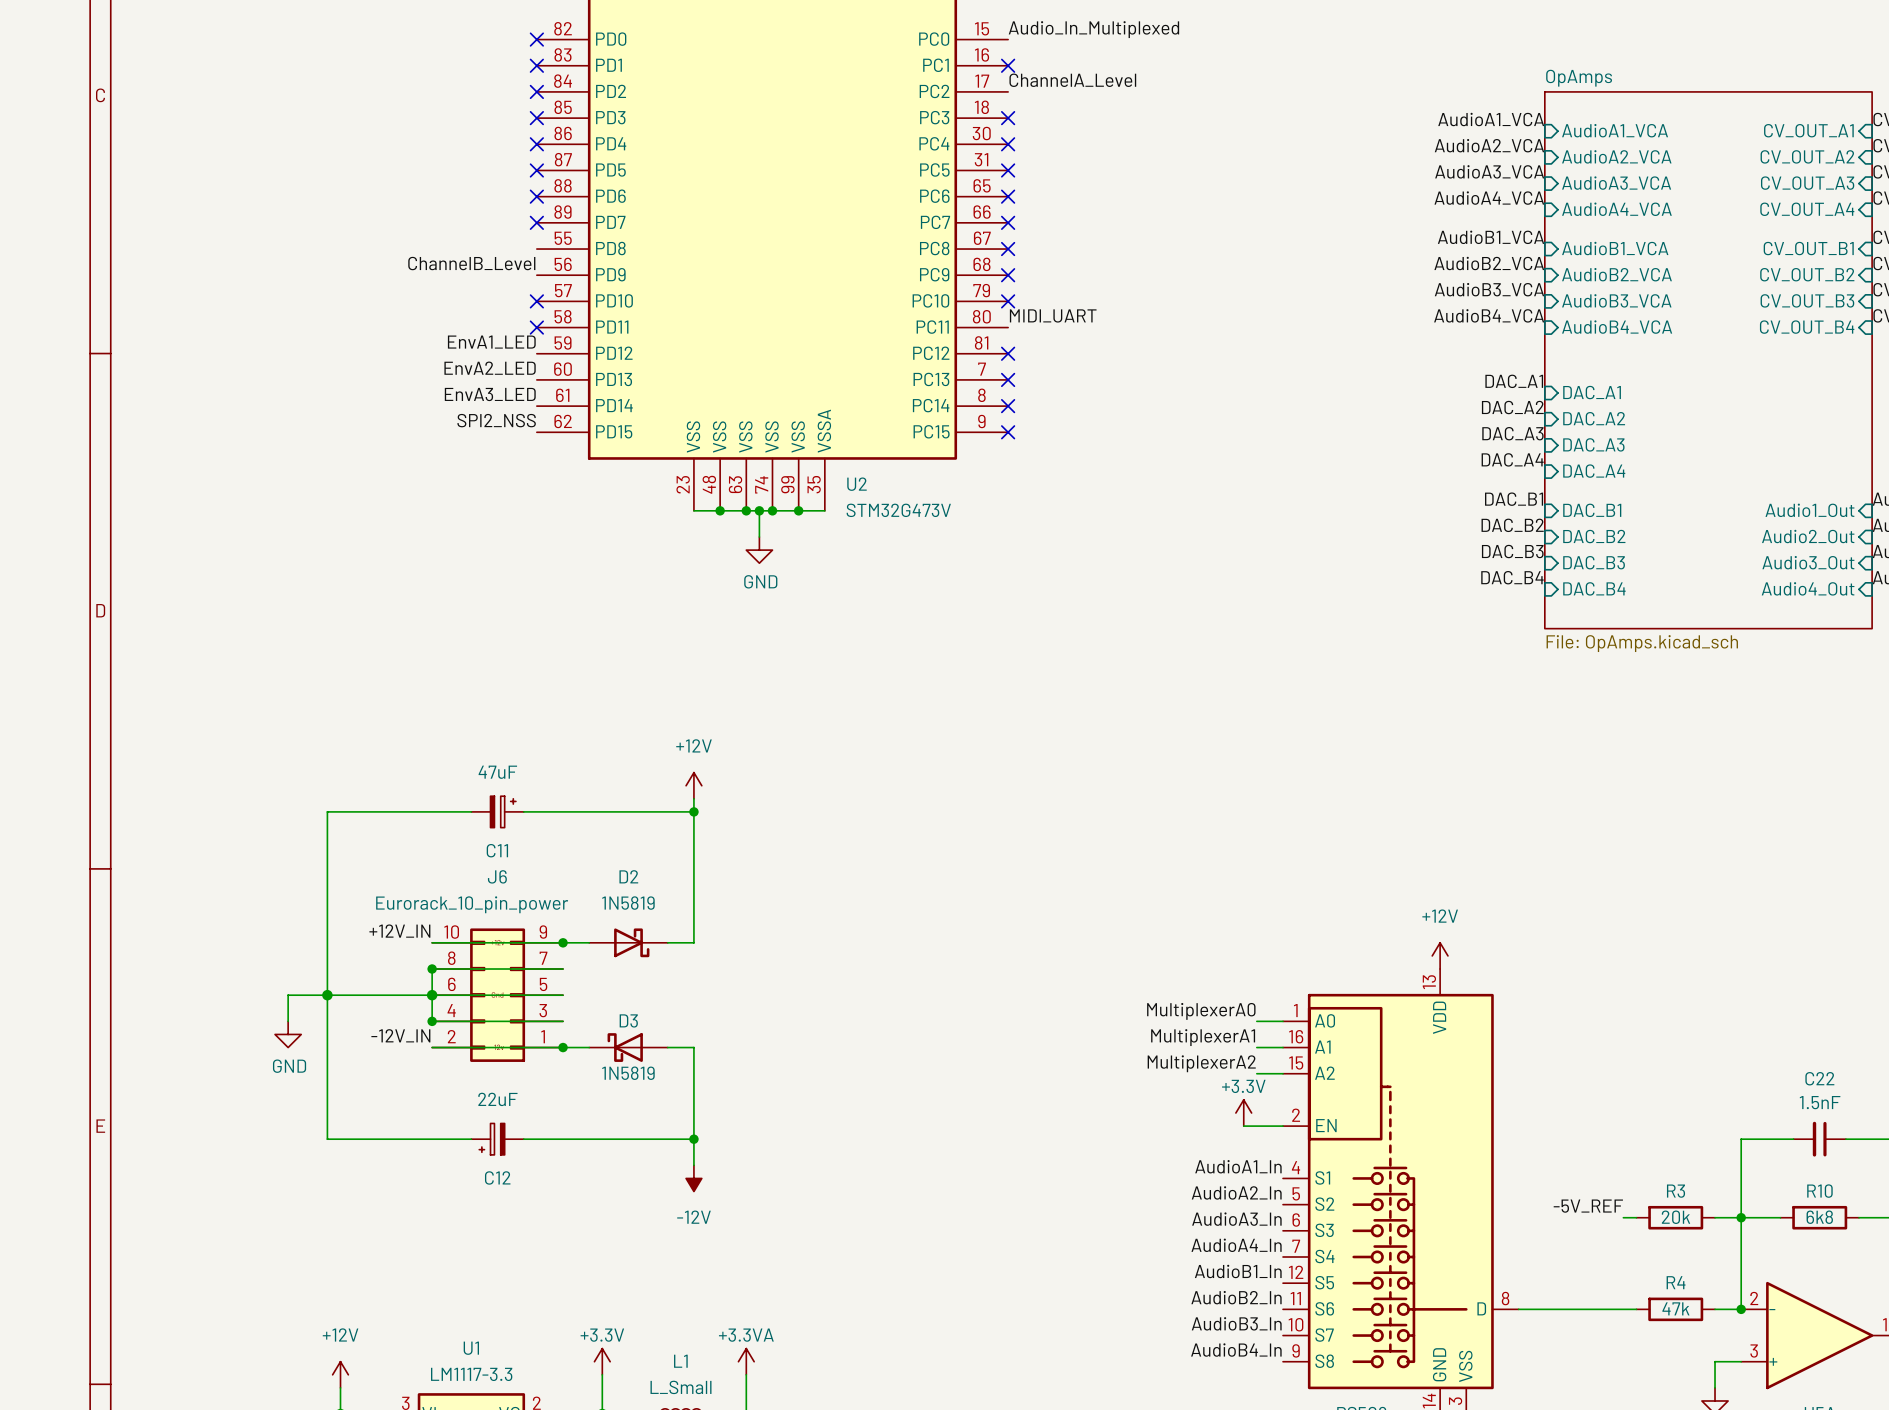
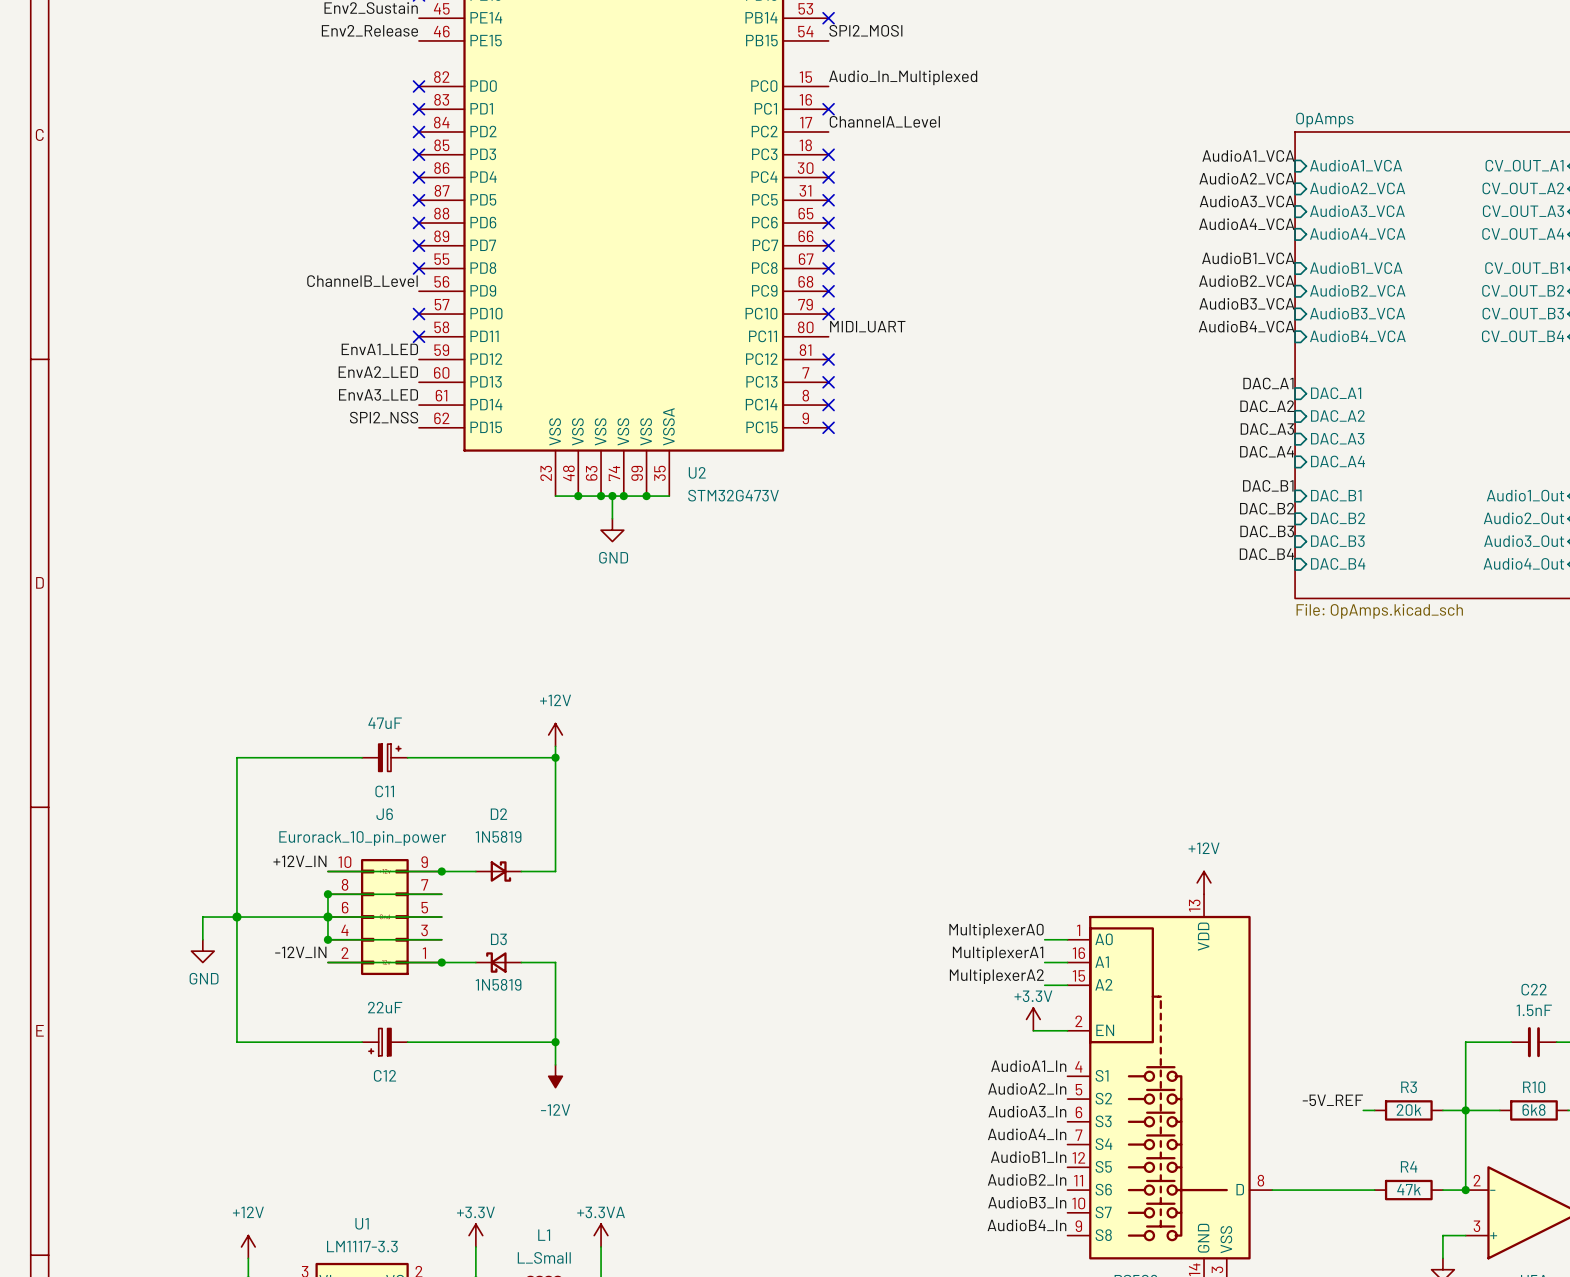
no-connect mark: none -> (419, 268)
D2 symbol: [589, 928, 668, 958] -> [475, 861, 522, 882]
D3 symbol: [589, 1033, 668, 1062] -> [475, 952, 522, 973]

